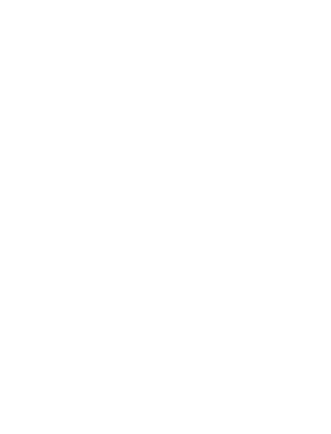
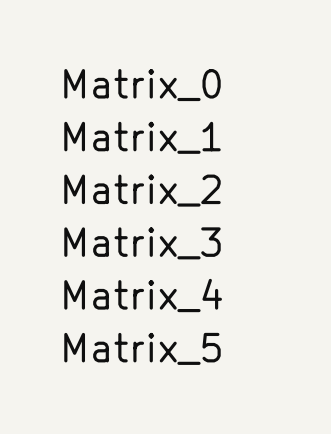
label: none -> Matrix_0 (142, 85)
label: none -> Matrix_1 (142, 137)
label: none -> Matrix_2 (142, 190)
label: none -> Matrix_3 (142, 243)
label: none -> Matrix_4 (143, 295)
label: none -> Matrix_5 (142, 348)

